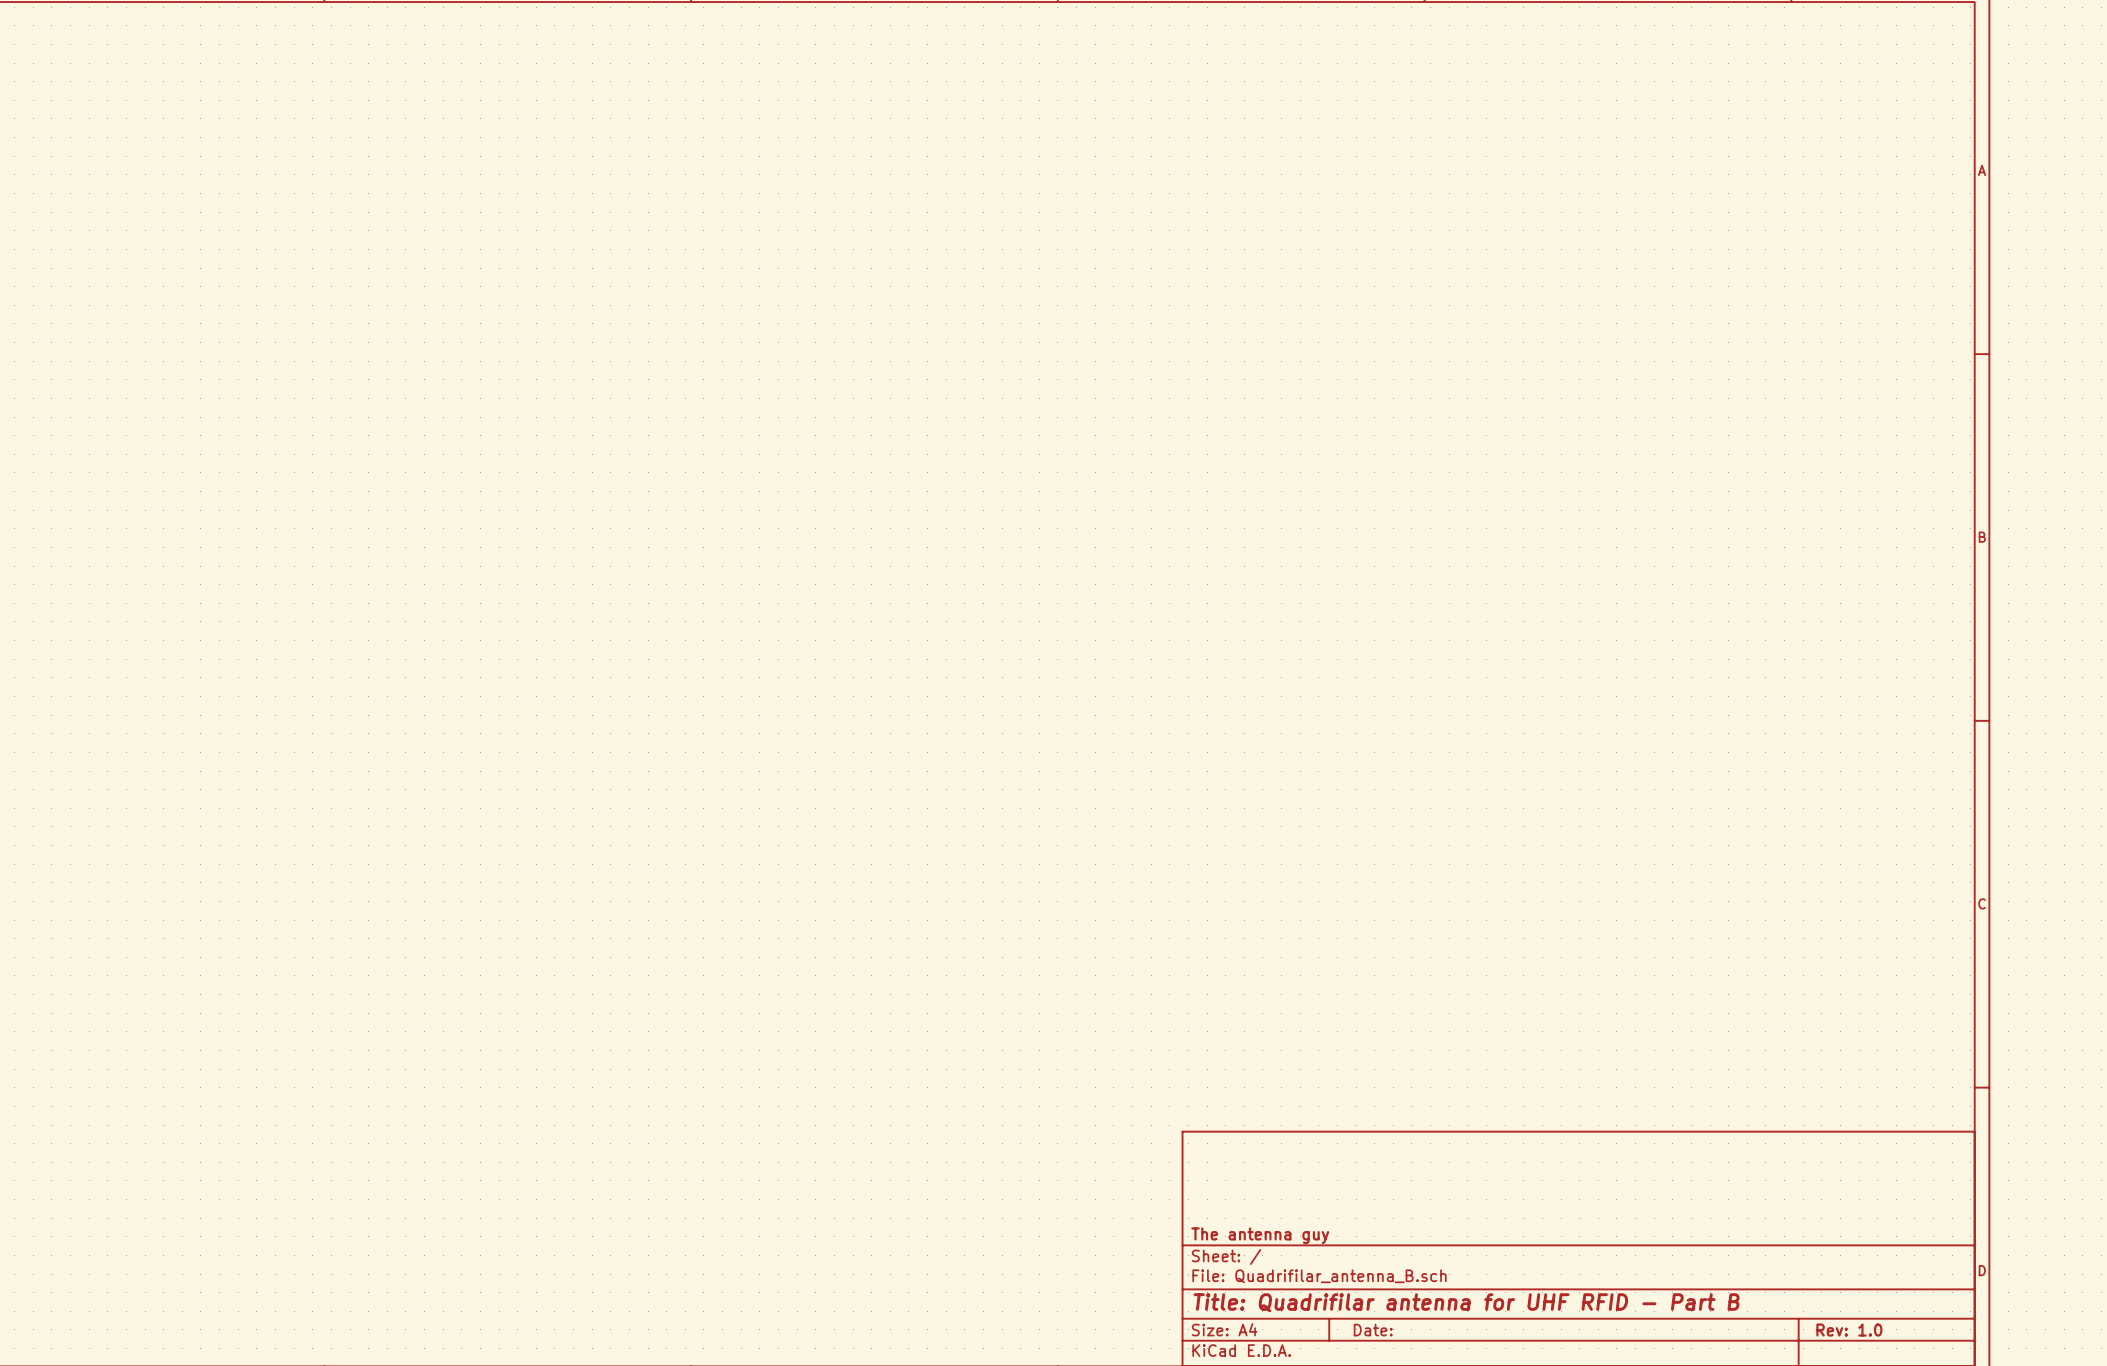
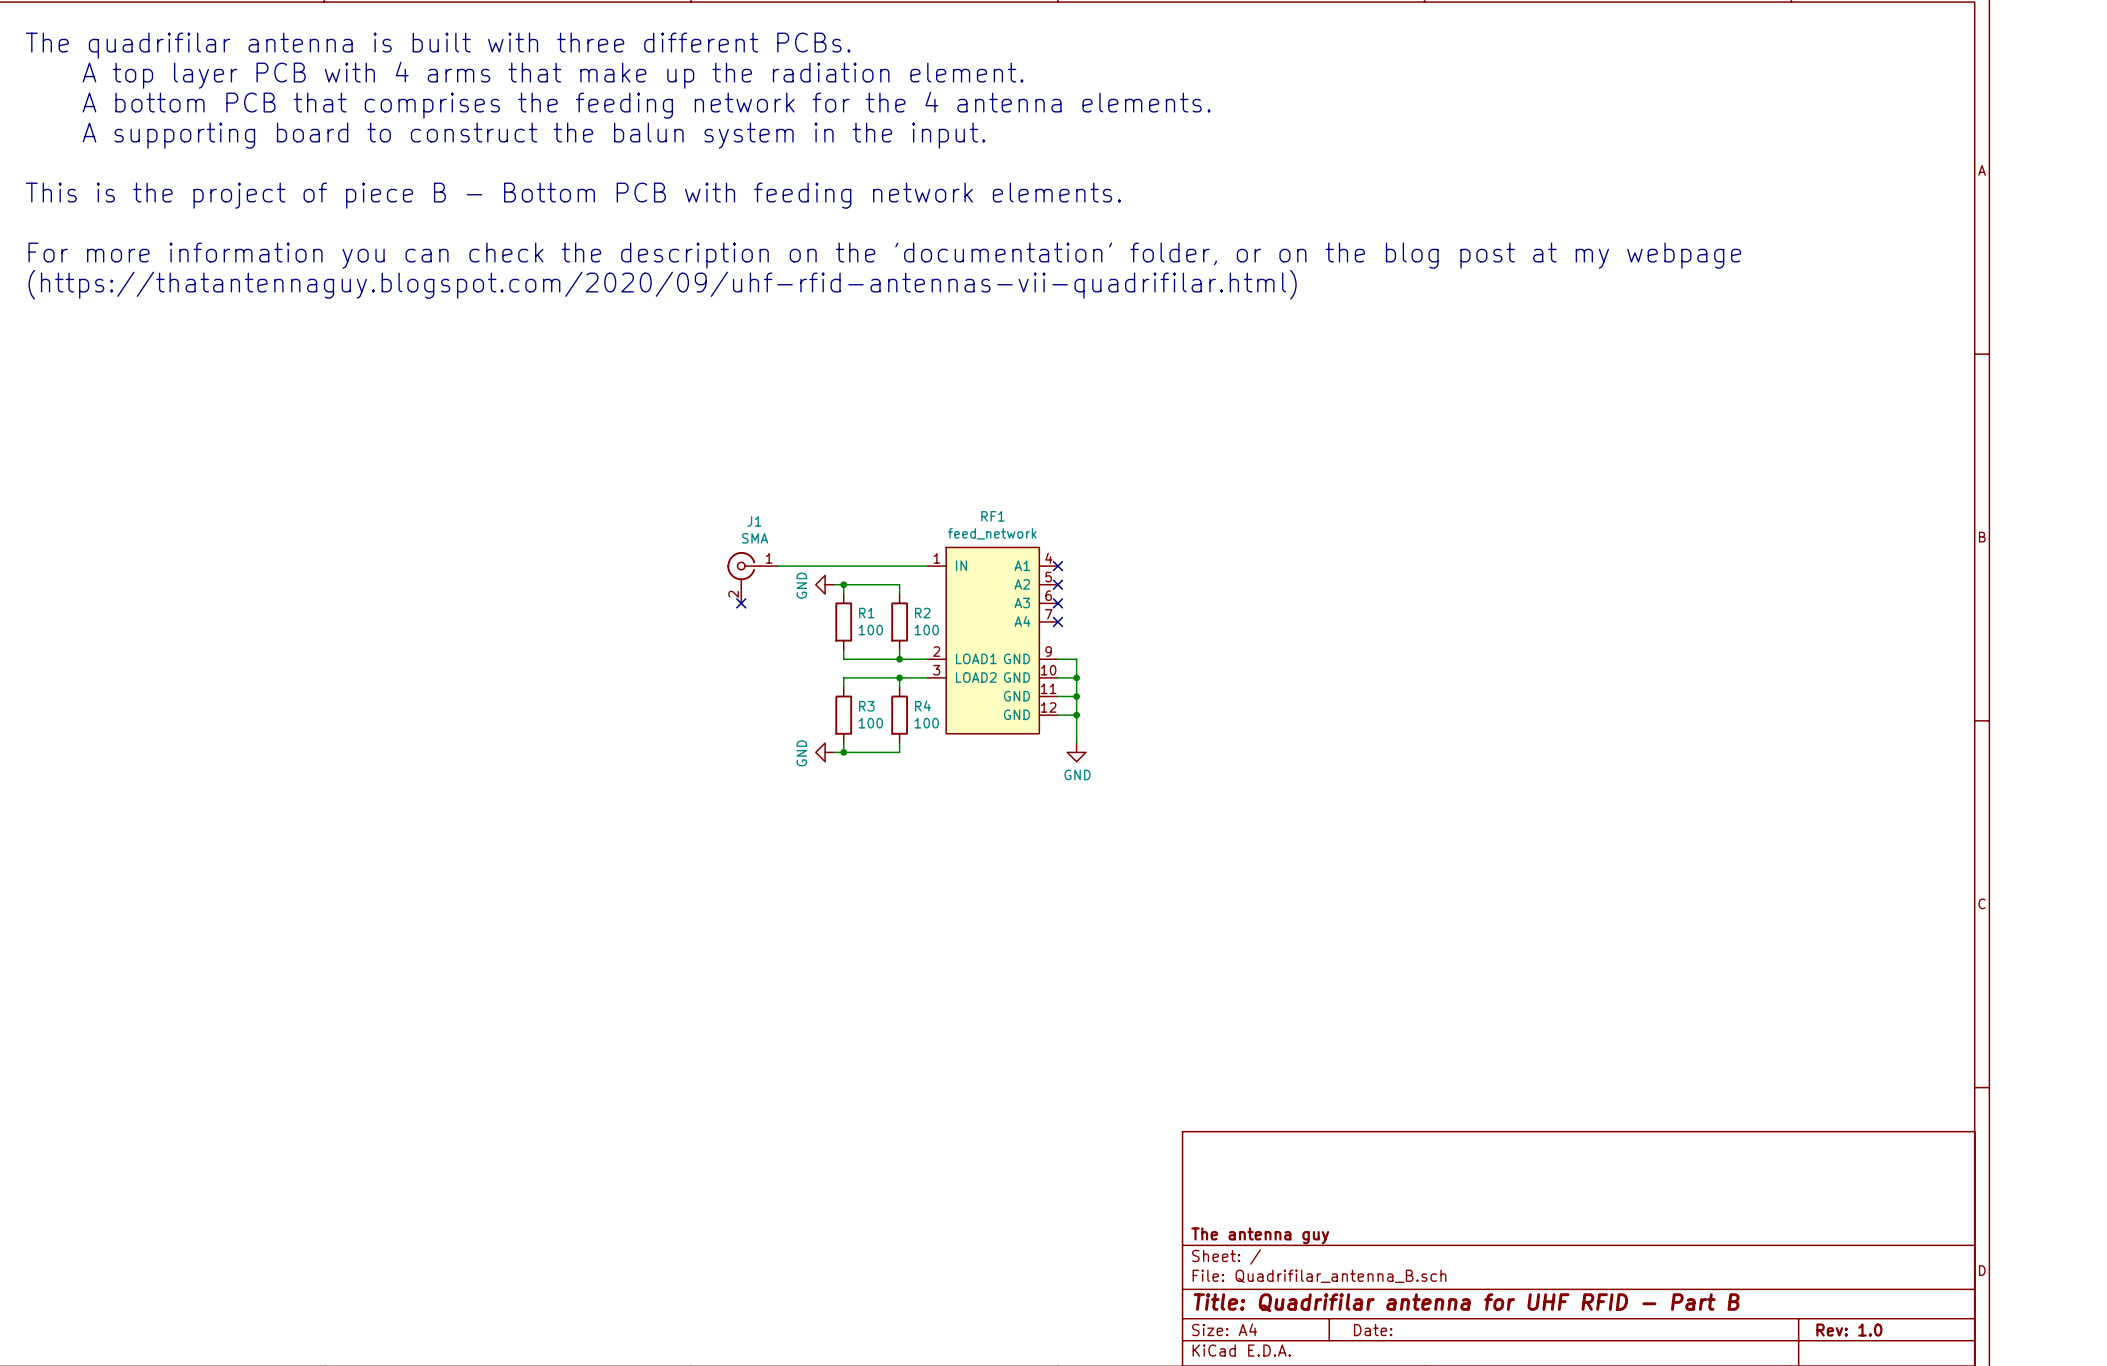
text: none -> The quadrifilar antenna is built with three different PCBs. (438, 45)
text: none -> A top layer PCB with 4 arms that make up the radiation element. (553, 75)
text: none -> A bottom PCB that comprises the feeding network for the 4 antenna elements. (646, 105)
text: none -> A supporting board to construct the balun system in the input. (533, 135)
text: none -> This is the project of piece B - Bottom PCB with feeding network elements. (573, 195)
text: none -> For more information you can check the description on the 'documentation' folder, or on the blog post at my webpage (884, 255)
text: none -> (https://thatantennaguy.blogspot.com/2020/09/uhf-rfid-antennas-vii-quadrifilar.html) (662, 284)
wire: none -> (778, 566) (927, 566)
no-connect mark: none -> (1057, 566)
J1: none -> SMA (752, 577)
power symbol: none -> GND (825, 584)
wire: none -> (834, 584) (899, 584) (899, 594)
wire: none -> (843, 584) (843, 594)
junction: none -> (843, 584)
no-connect mark: none -> (1057, 584)
no-connect mark: none -> (741, 603)
no-connect mark: none -> (1057, 603)
R1: none -> 100 (843, 621)
R2: none -> 100 (899, 621)
no-connect mark: none -> (1057, 621)
RF1: none -> feed_network (992, 640)
wire: none -> (843, 649) (843, 659) (927, 659)
wire: none -> (899, 649) (899, 659)
junction: none -> (899, 659)
wire: none -> (1057, 659) (1076, 659) (1076, 743)
wire: none -> (899, 677) (899, 687)
junction: none -> (899, 677)
wire: none -> (927, 677) (843, 677) (843, 687)
wire: none -> (1057, 677) (1076, 677)
junction: none -> (1076, 677)
wire: none -> (1057, 696) (1076, 696)
junction: none -> (1076, 696)
R3: none -> 100 (843, 715)
R4: none -> 100 (899, 715)
wire: none -> (1057, 715) (1076, 715)
junction: none -> (1076, 715)
wire: none -> (843, 743) (843, 752)
wire: none -> (899, 743) (899, 752) (834, 752)
power symbol: none -> GND (825, 752)
junction: none -> (843, 752)
power symbol: none -> GND (1076, 752)

